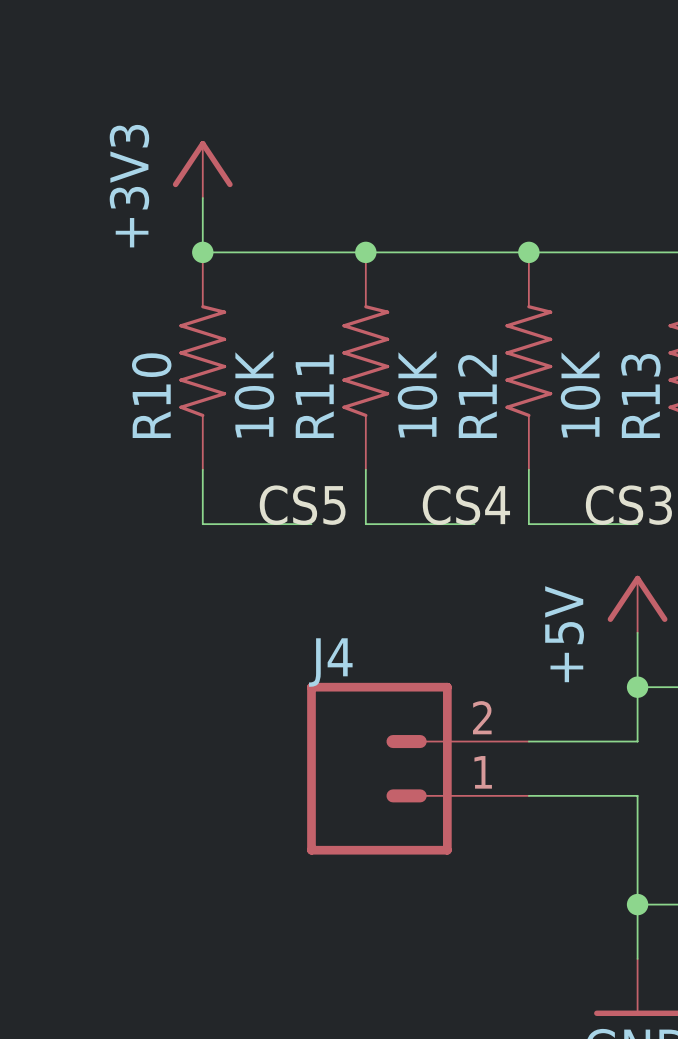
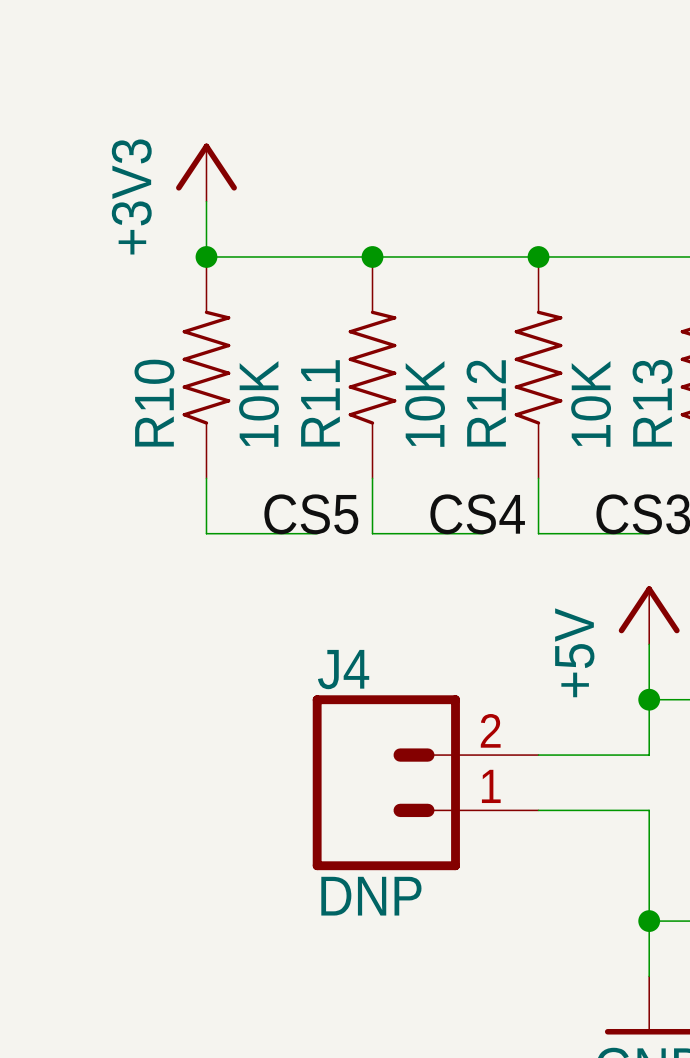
J4 value: none -> DNP (371, 896)

